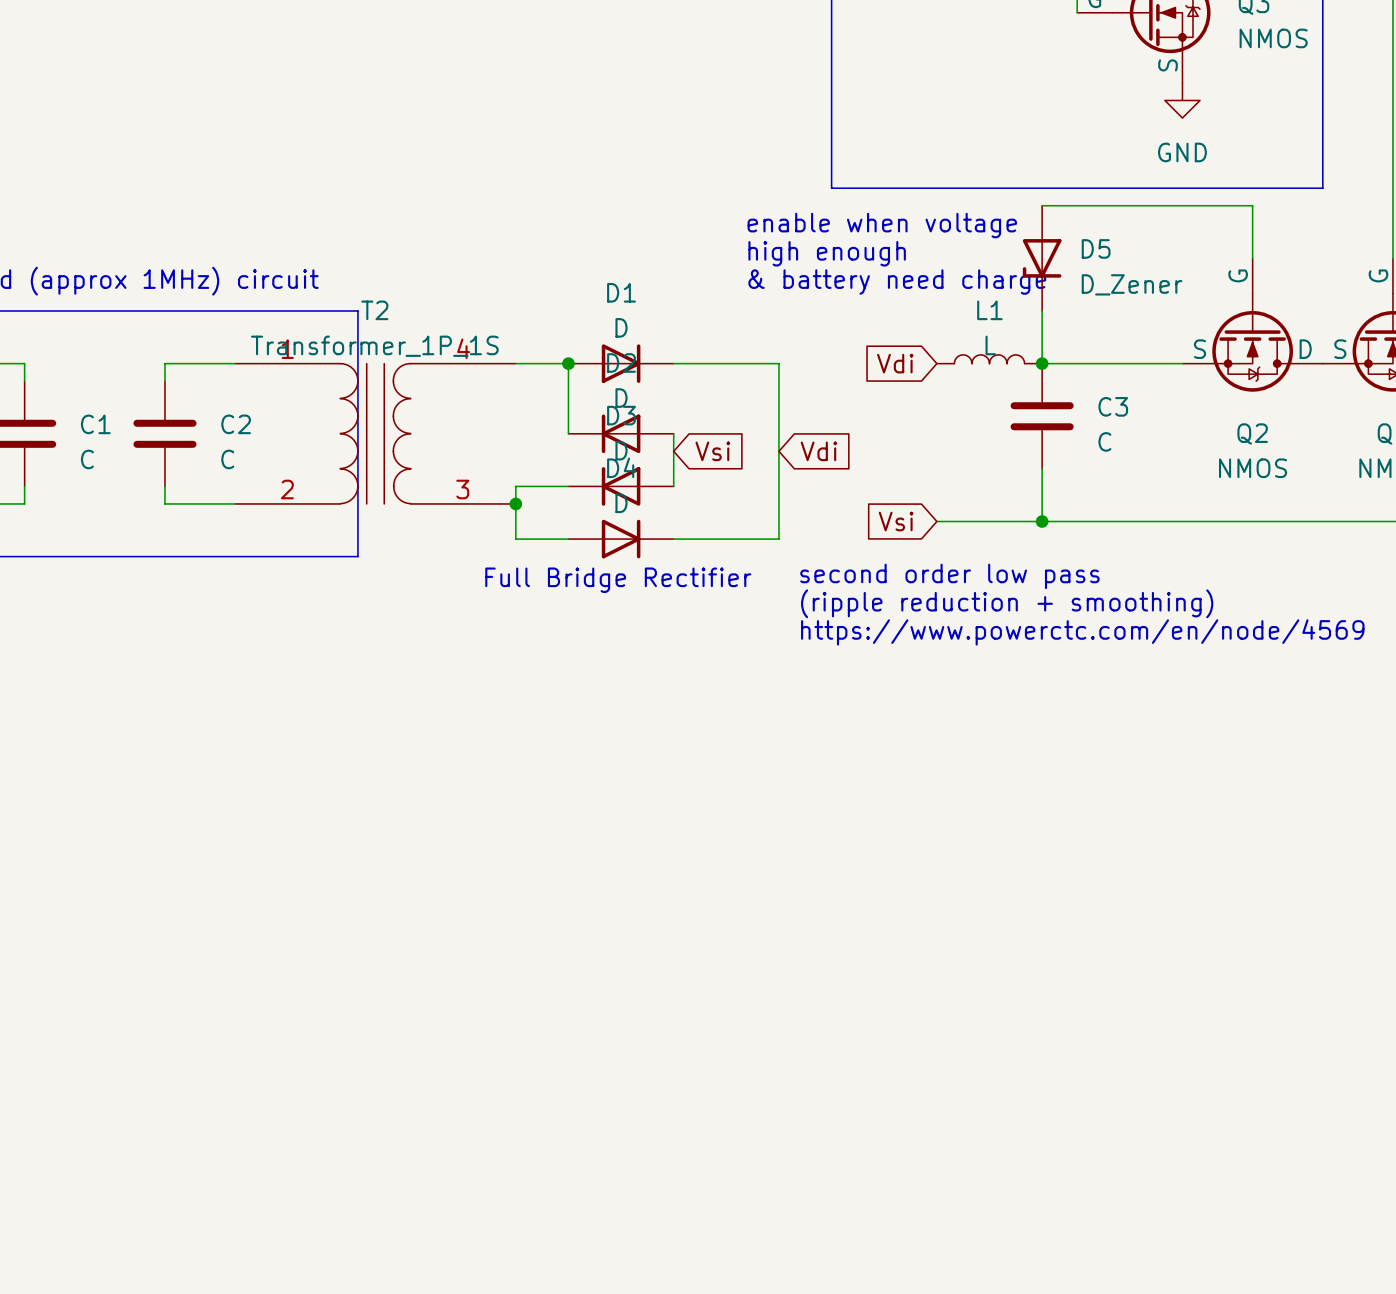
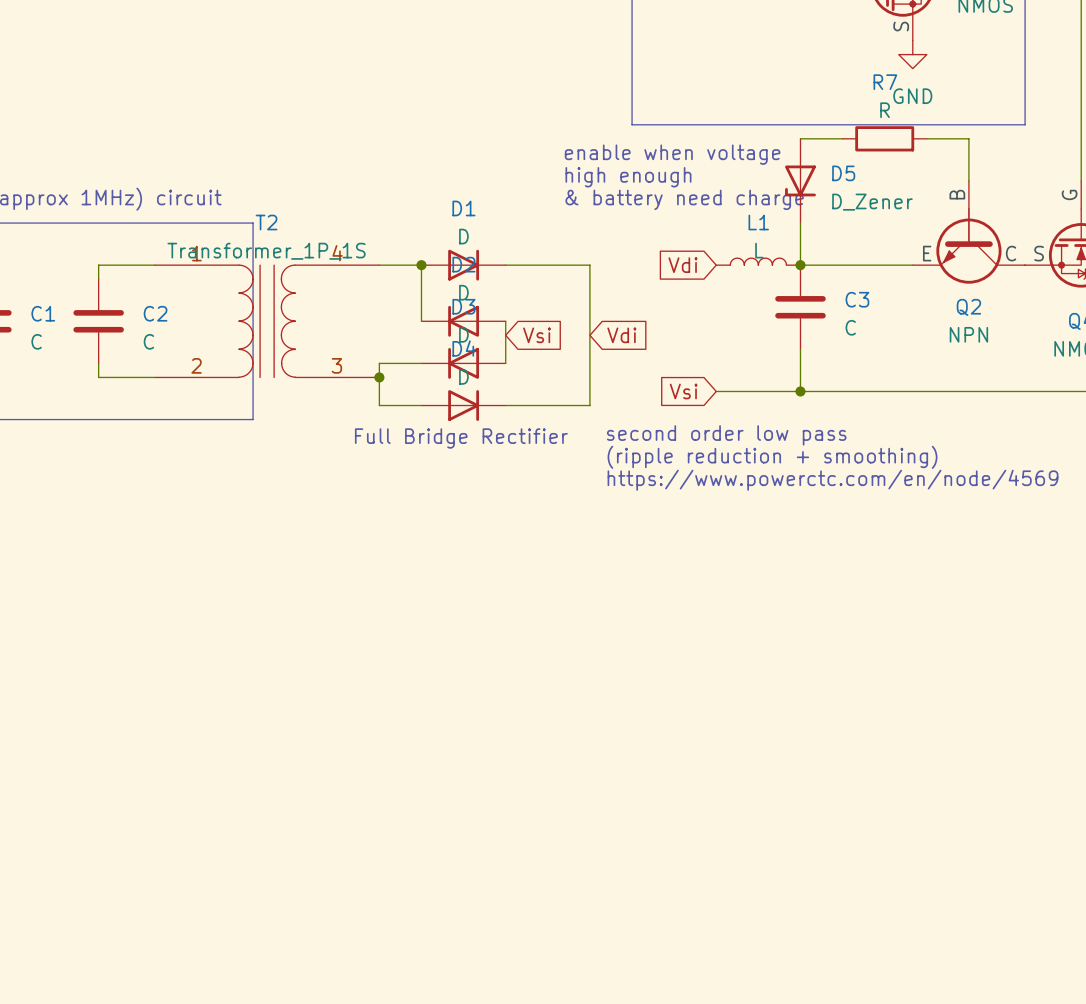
wire: (1094, 205) (1200, 205) -> none
R7: none -> R (884, 138)
Q2 symbol: [1182, 258, 1323, 392] -> [912, 180, 1026, 284]
Q2 value: NMOS (1253, 468) -> NPN (968, 334)

